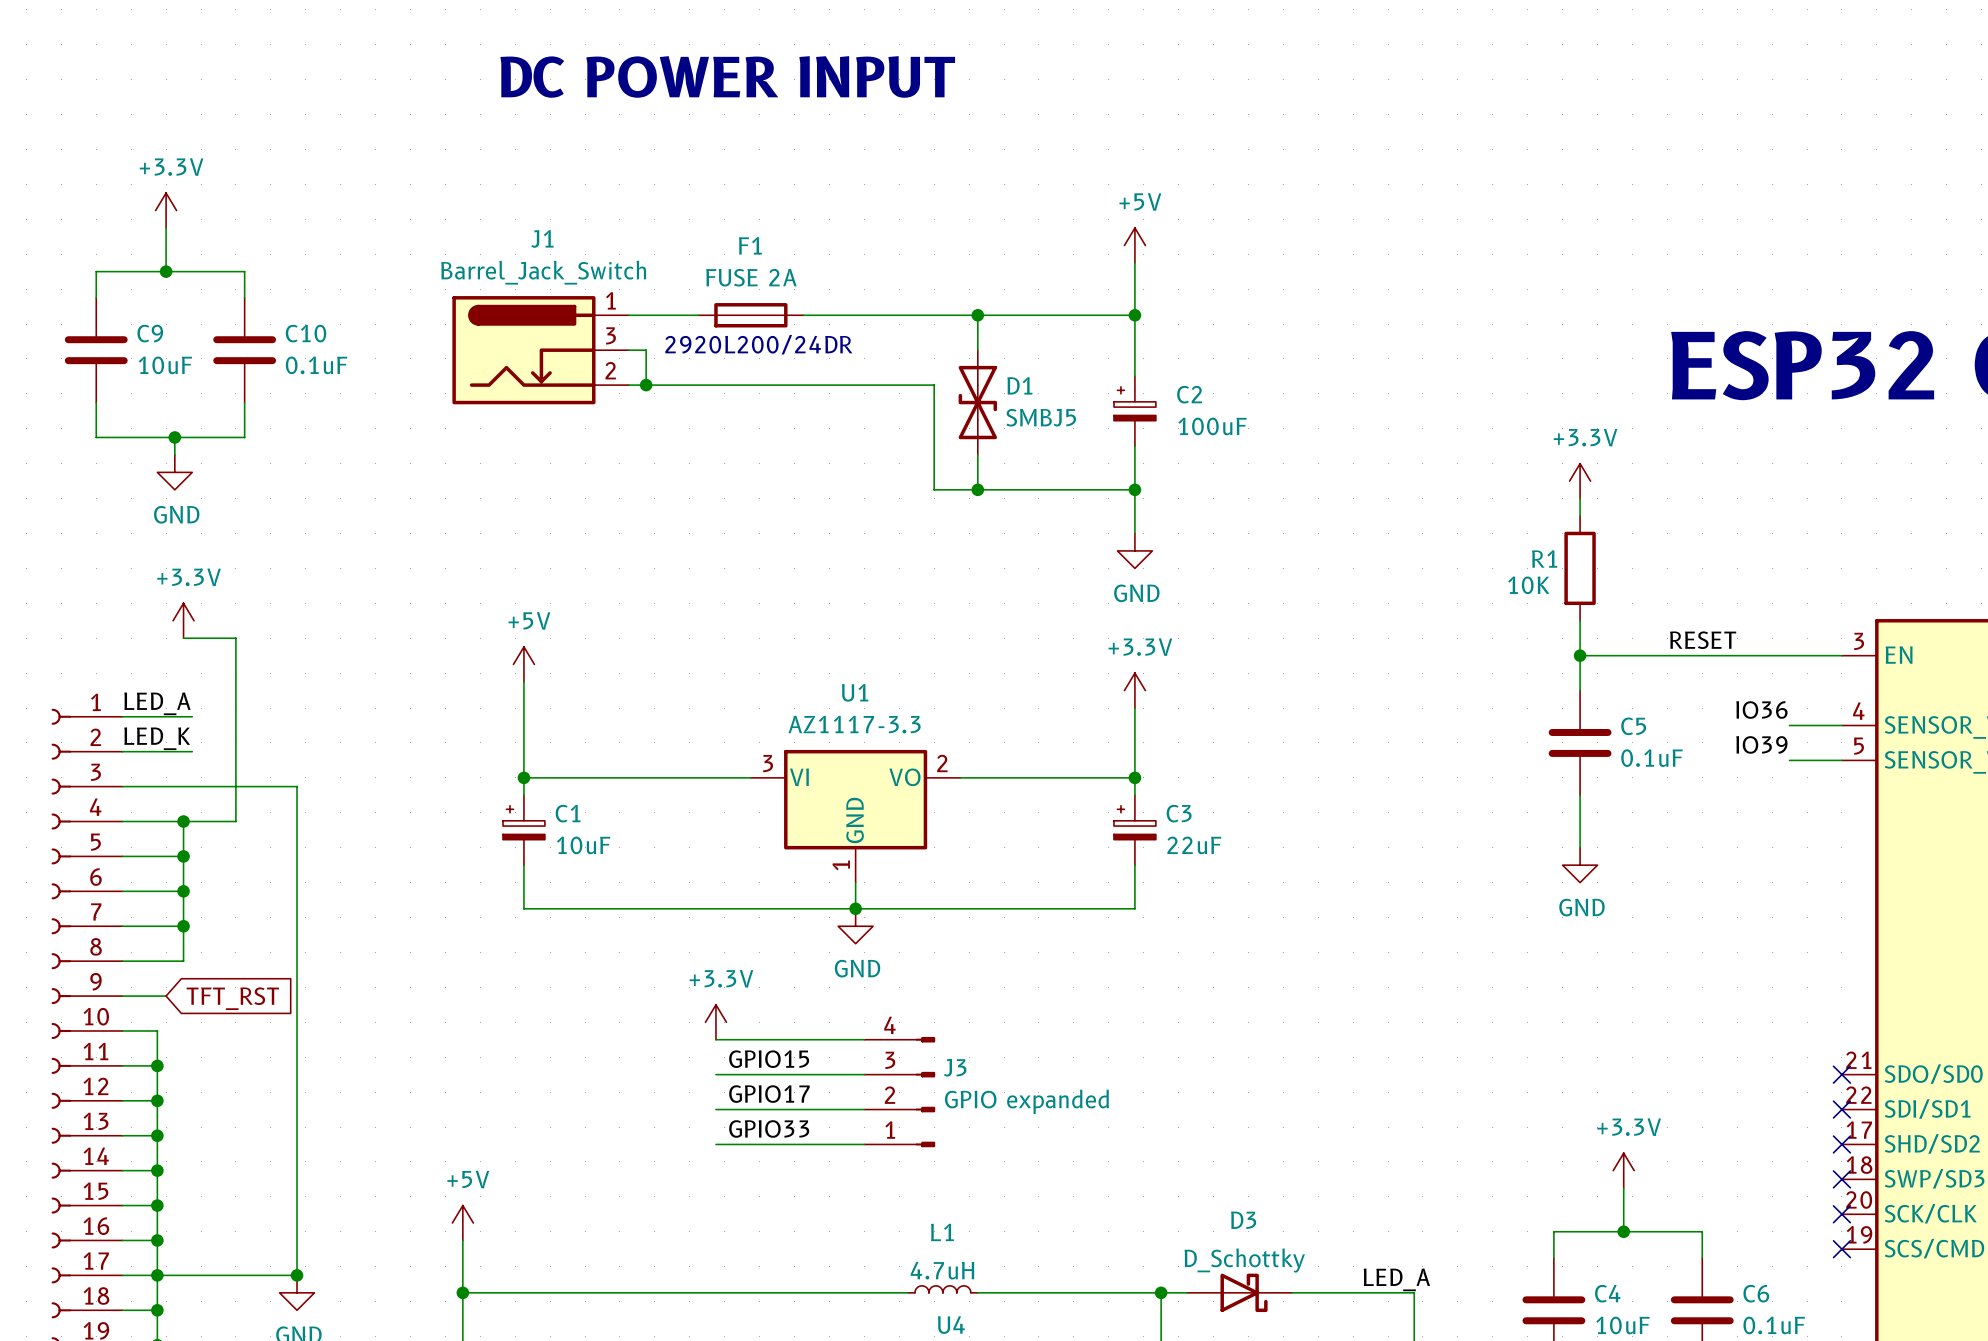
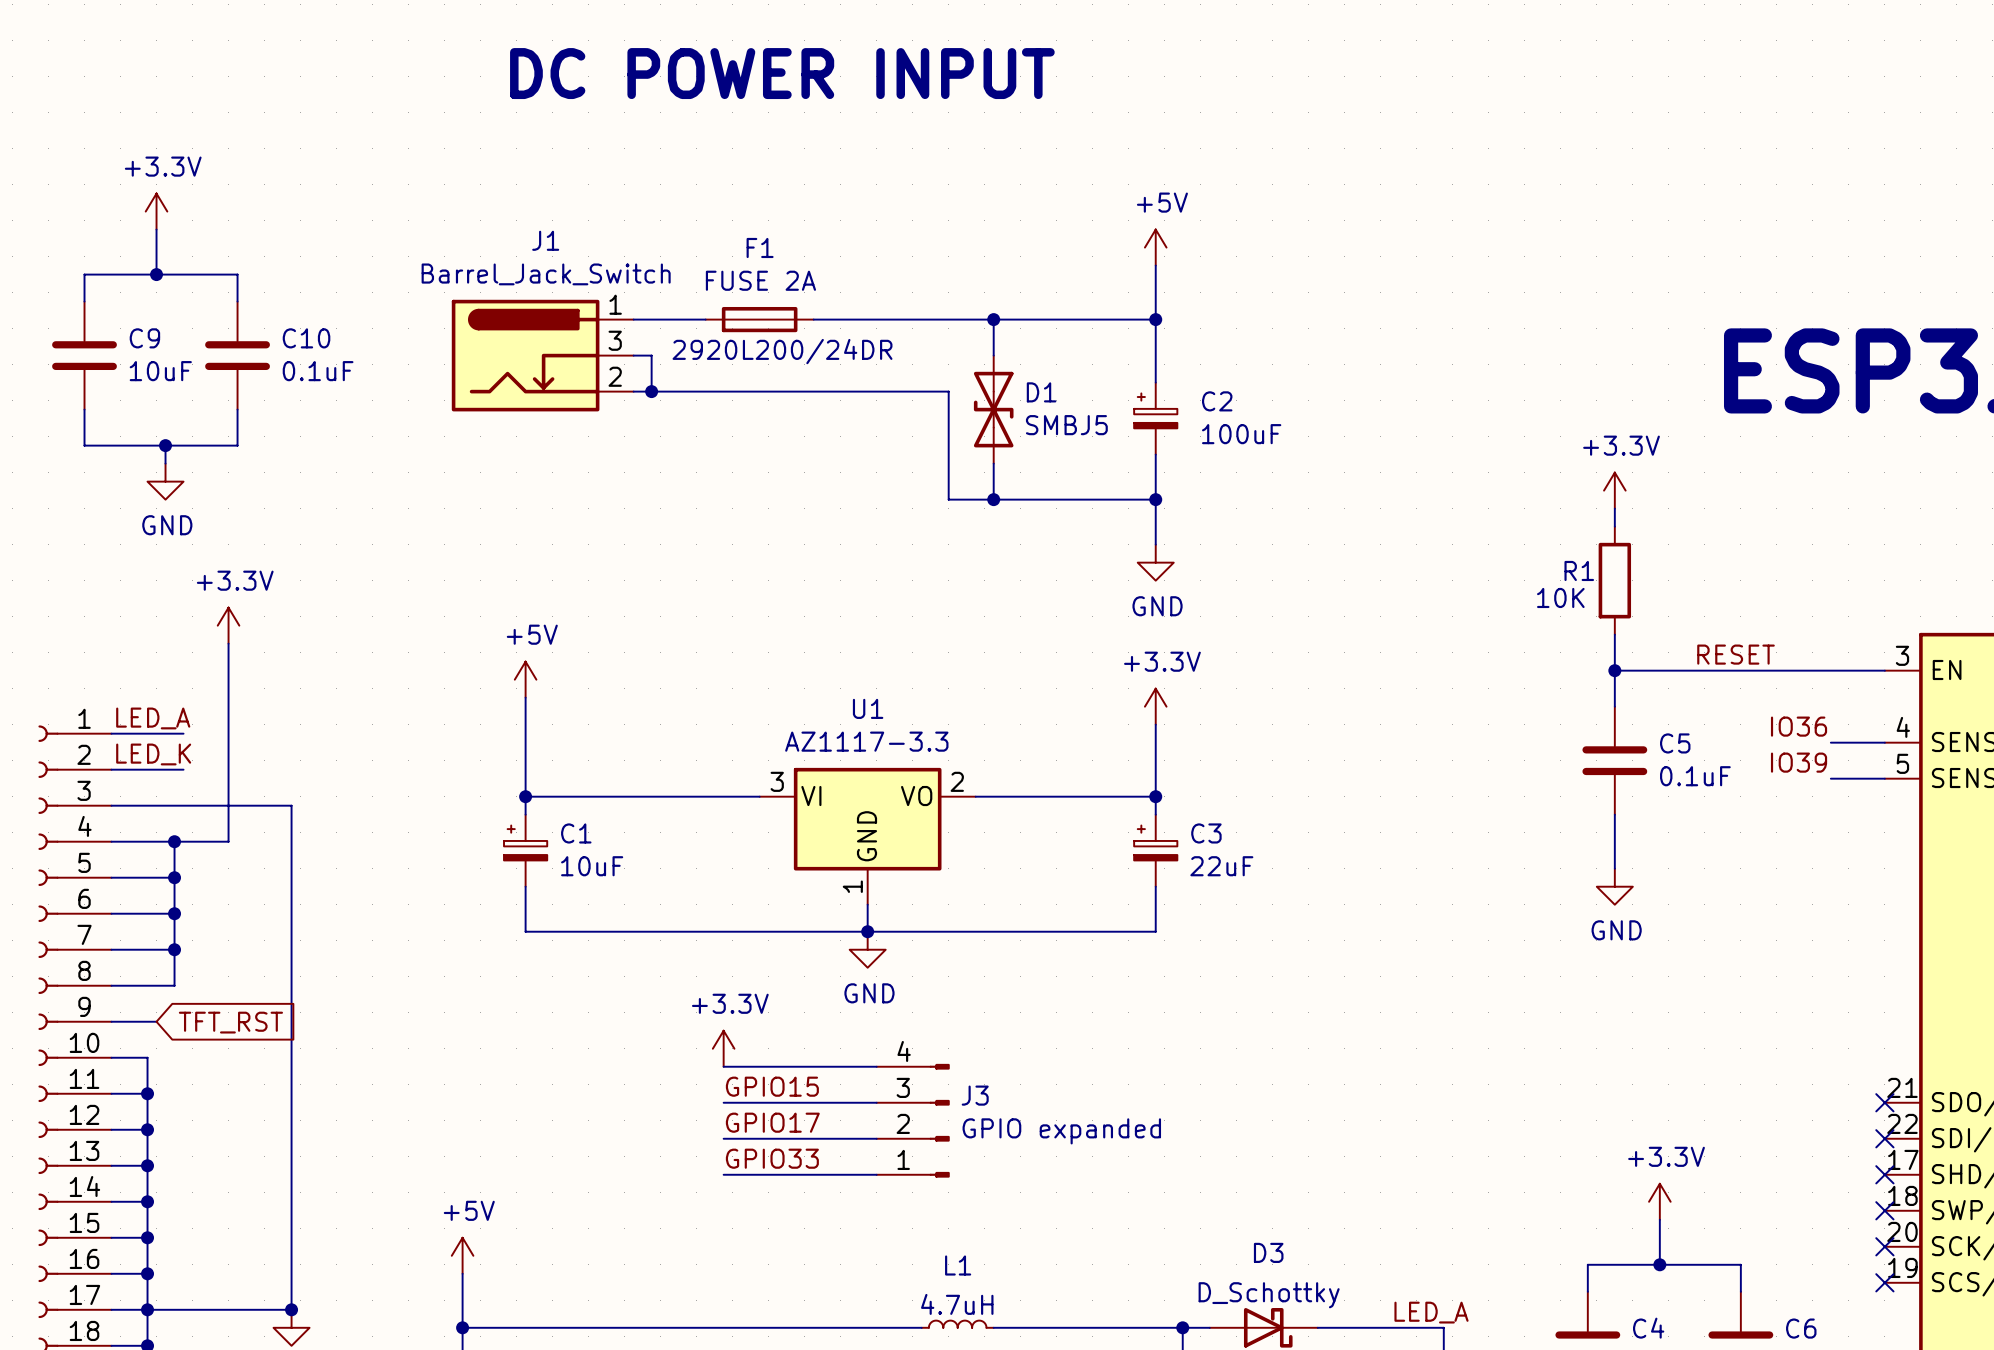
power symbol position: +3.3V (183, 620) -> +3.3V (228, 625)
wire: (183, 638) (235, 638) -> (228, 643) (228, 652)

